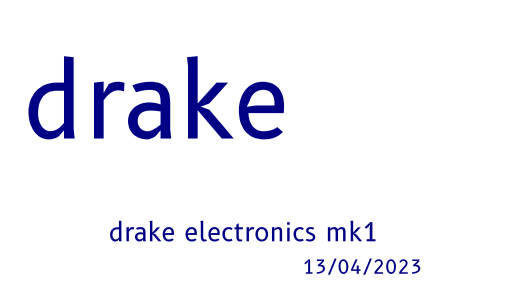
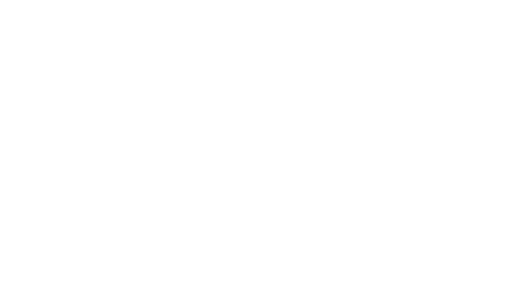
text: drake (156, 97) -> none
text: drake electronics mk1 (242, 231) -> none
text: 13/04/2023 (362, 266) -> none

